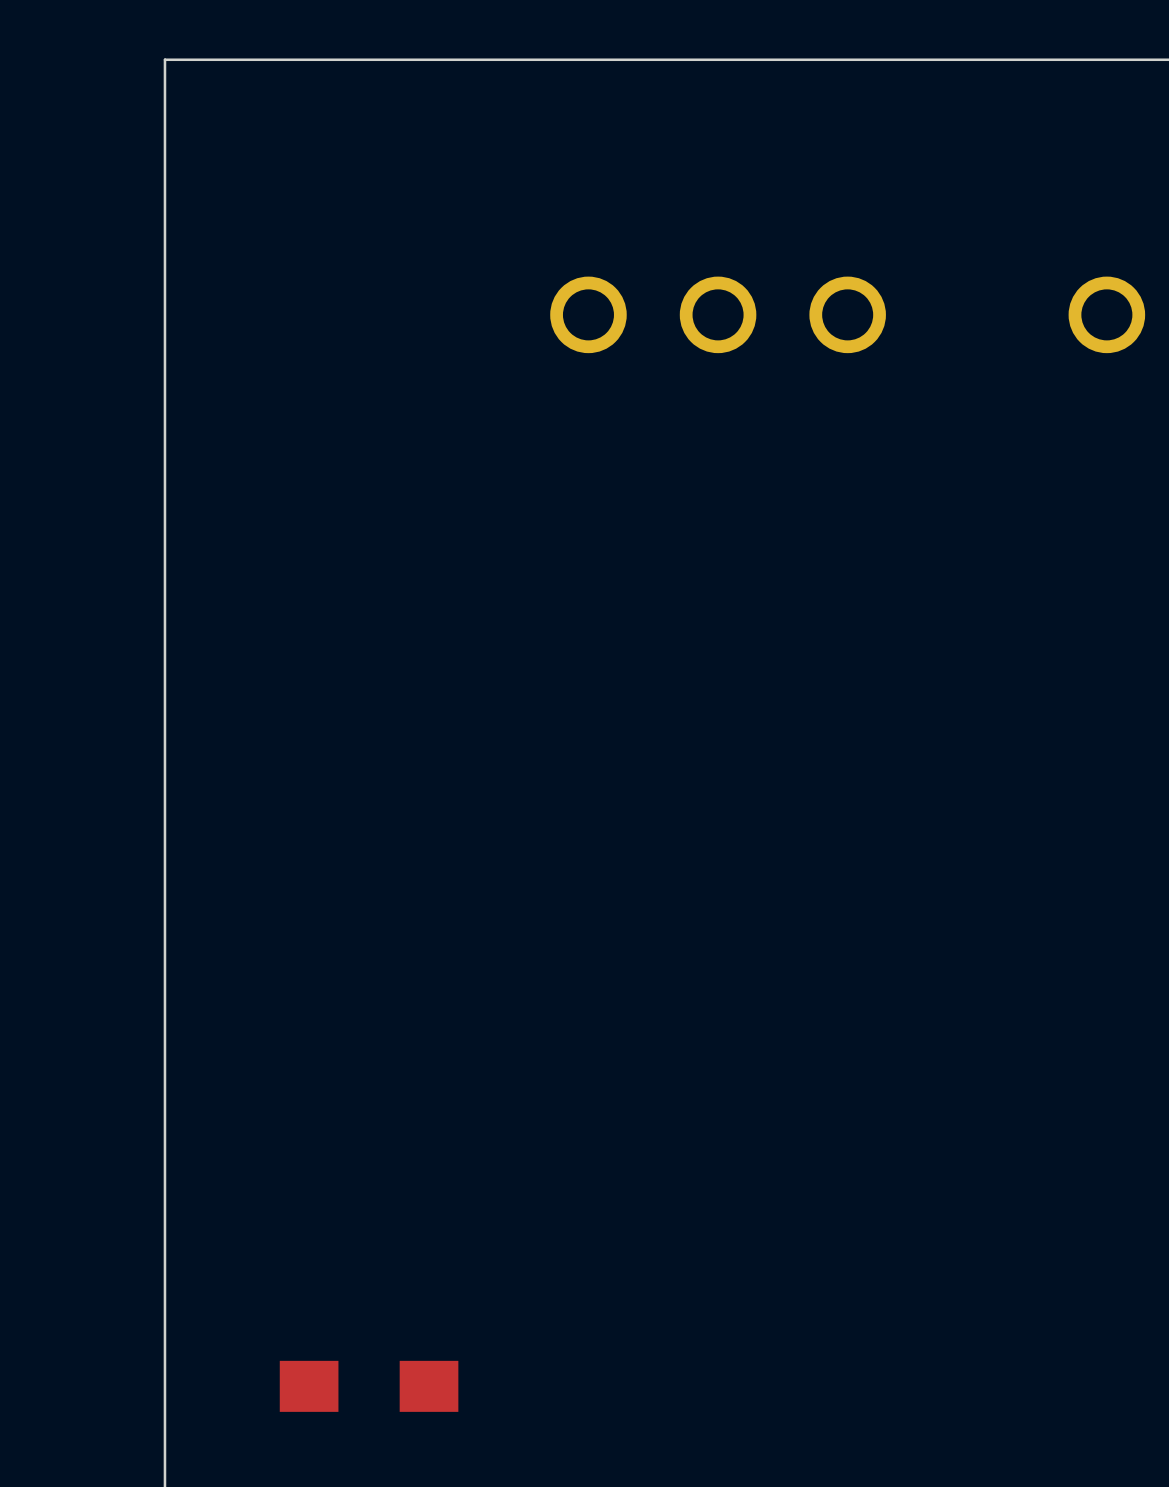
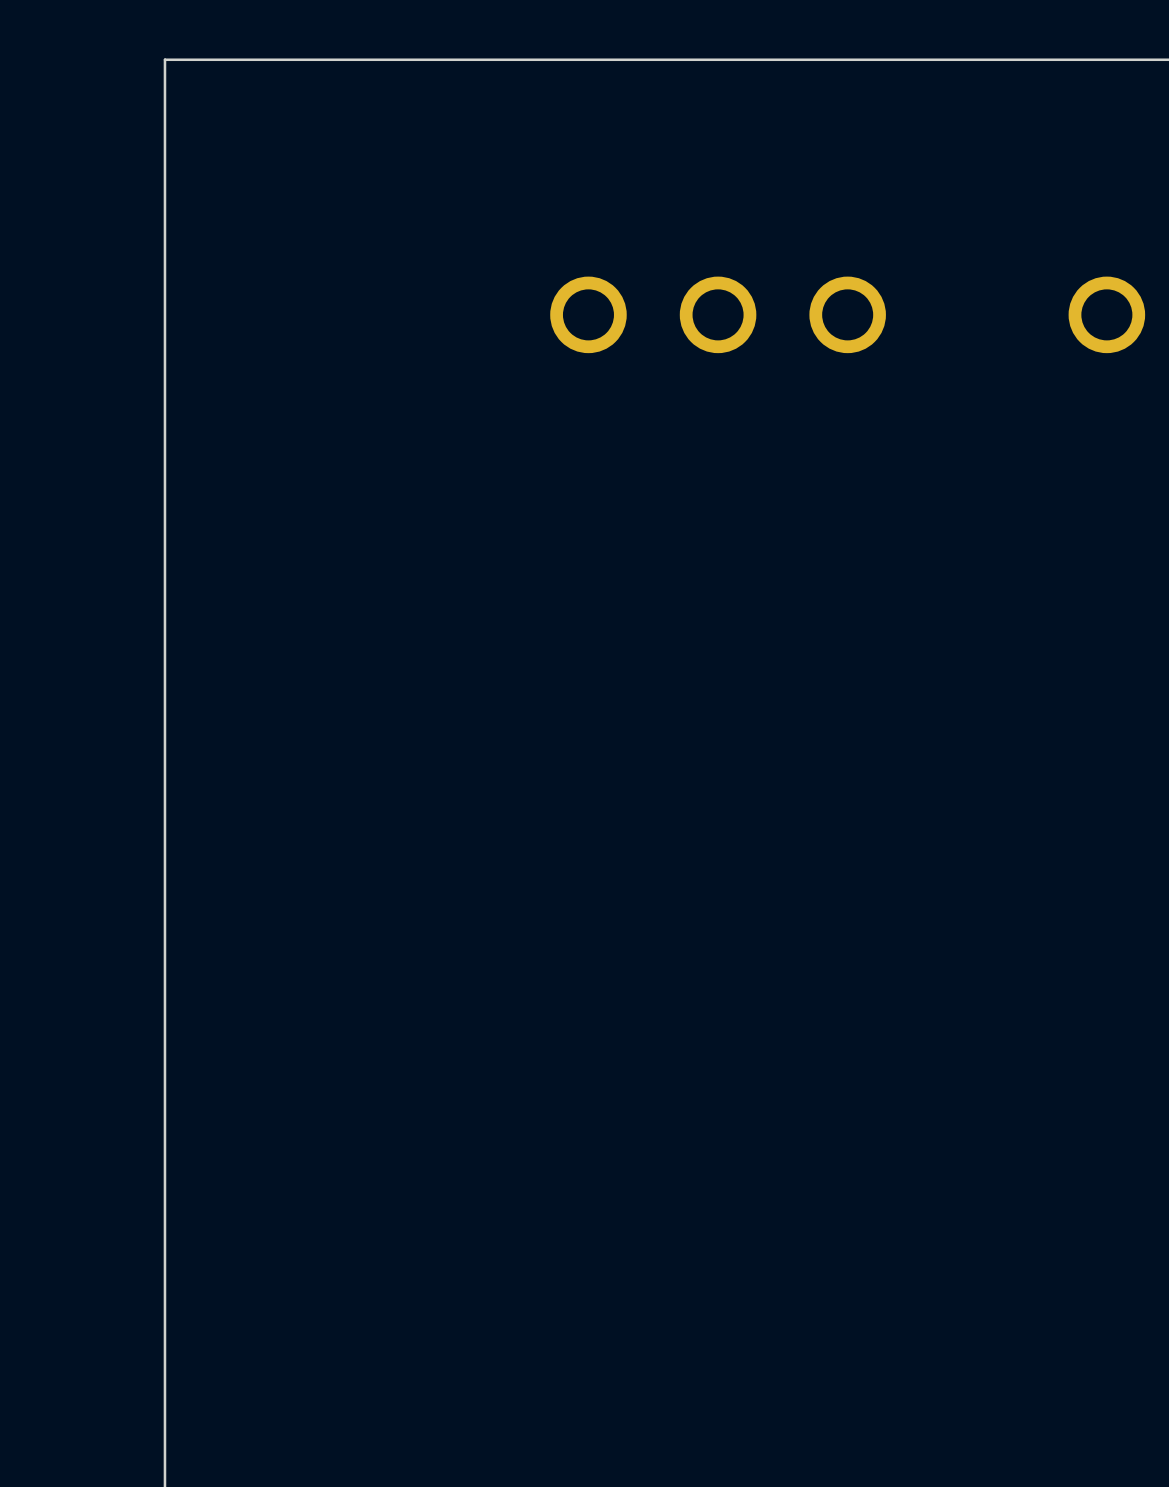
part: (369, 1386) -> none

